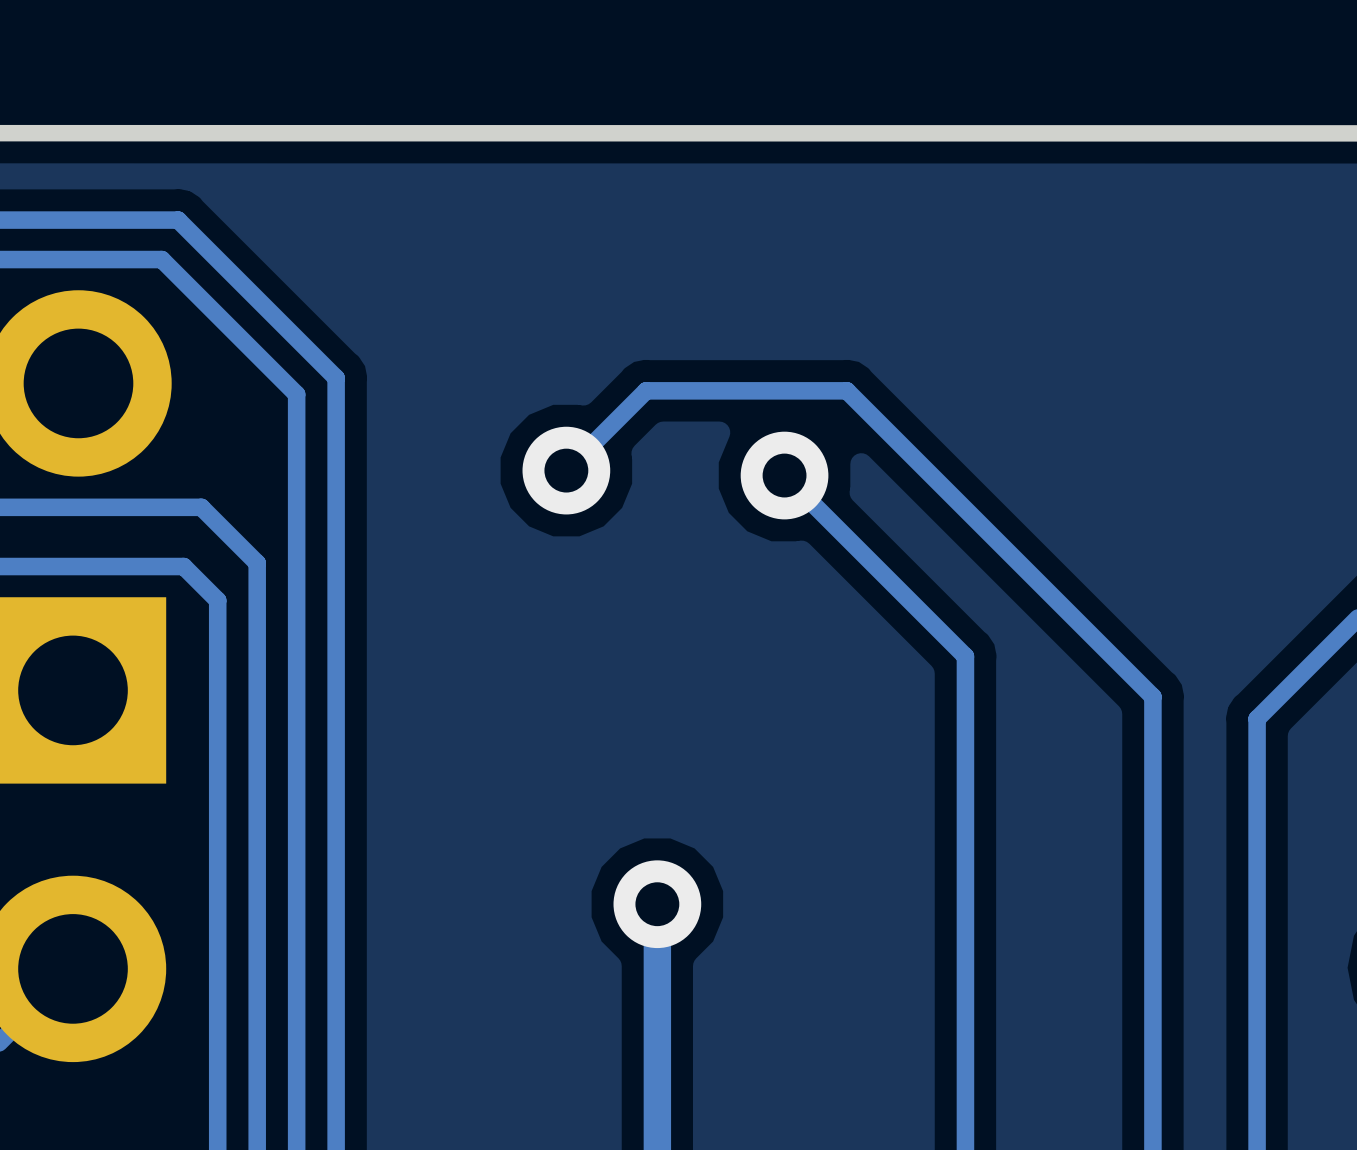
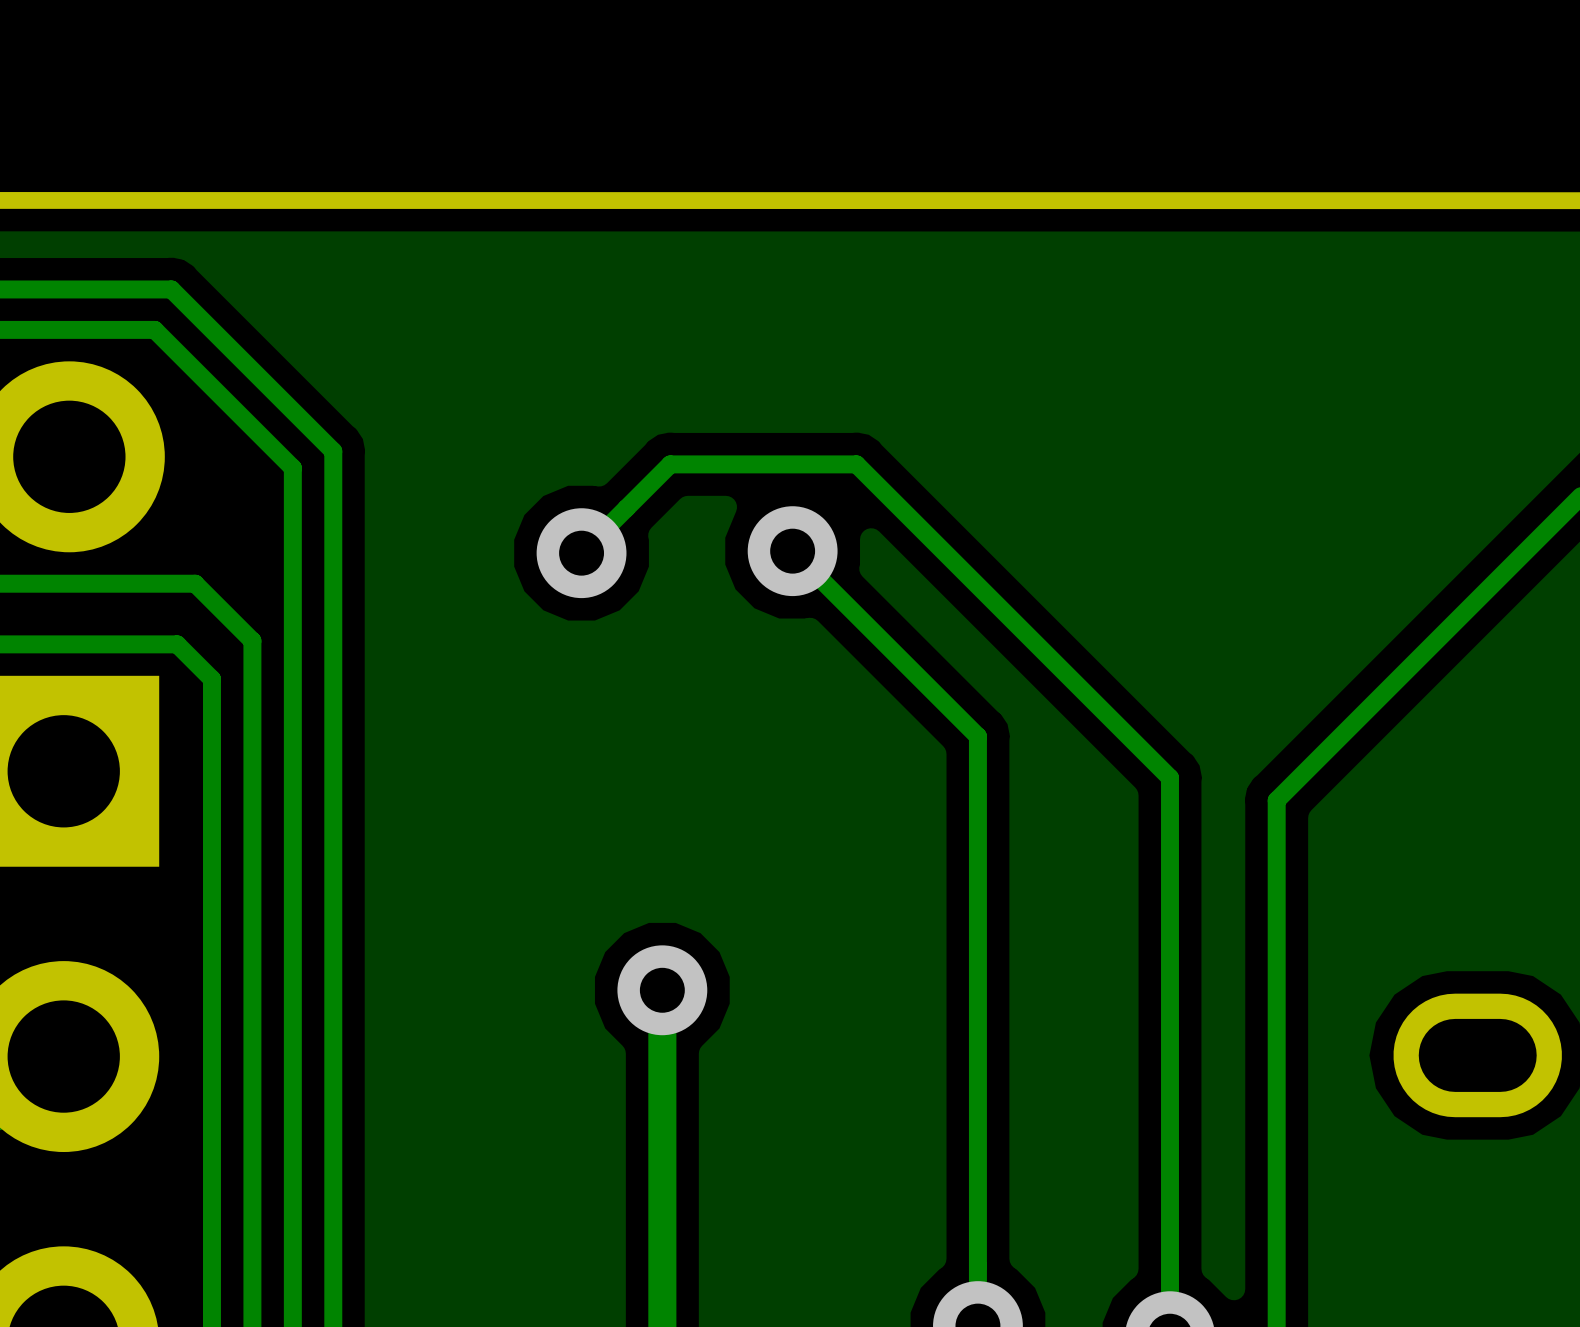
track: (665, 390) (646, 390) (566, 470) -> (670, 464) (581, 553)
via position: (566, 470) -> (581, 553)

